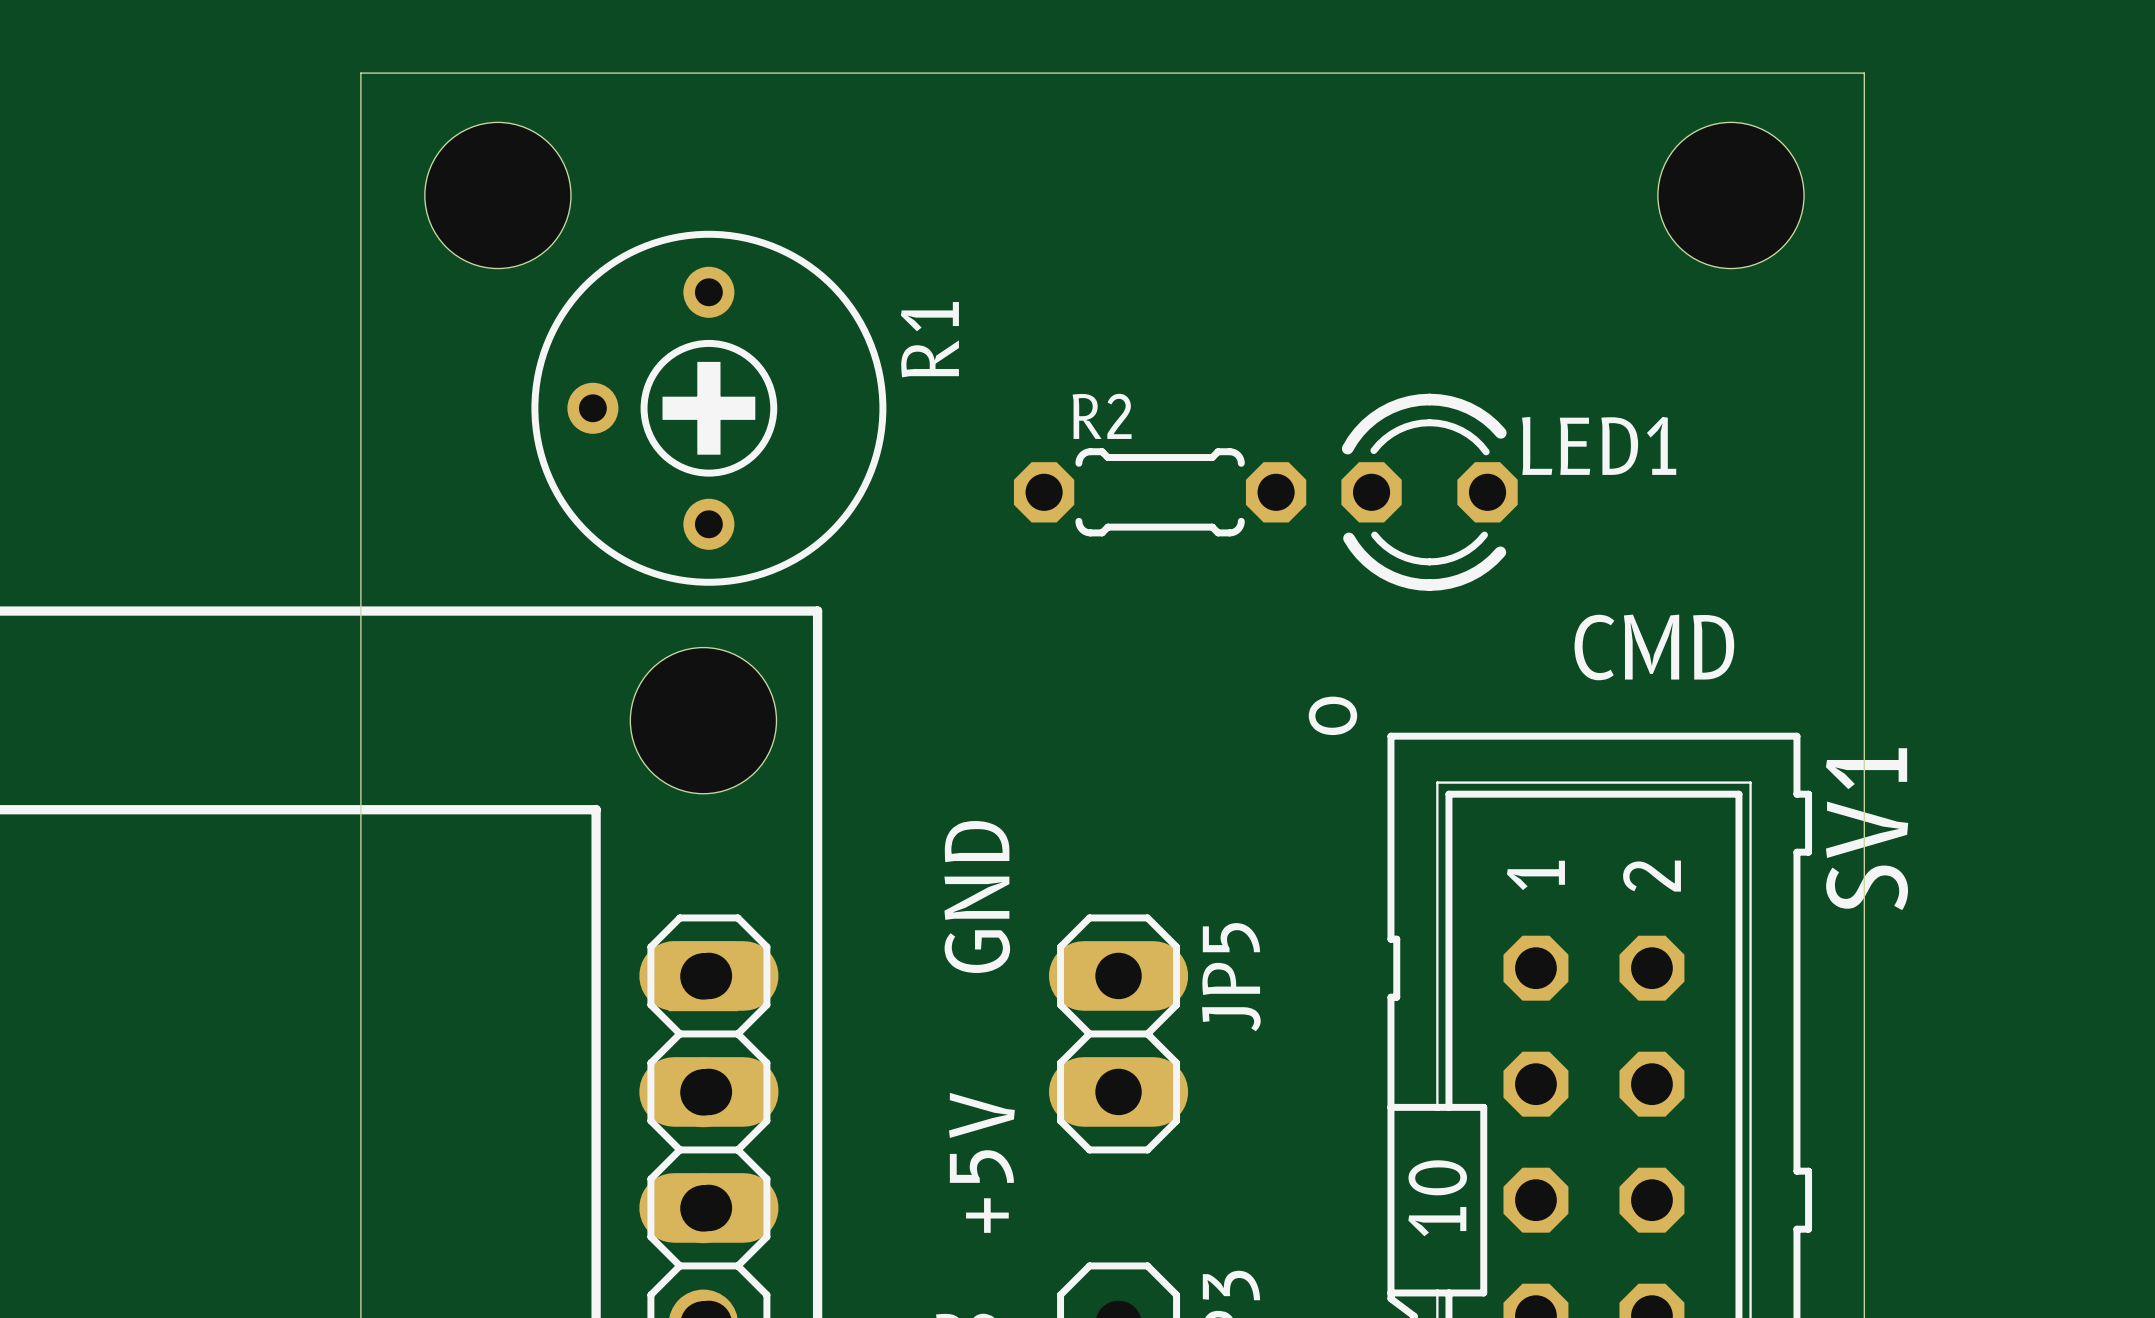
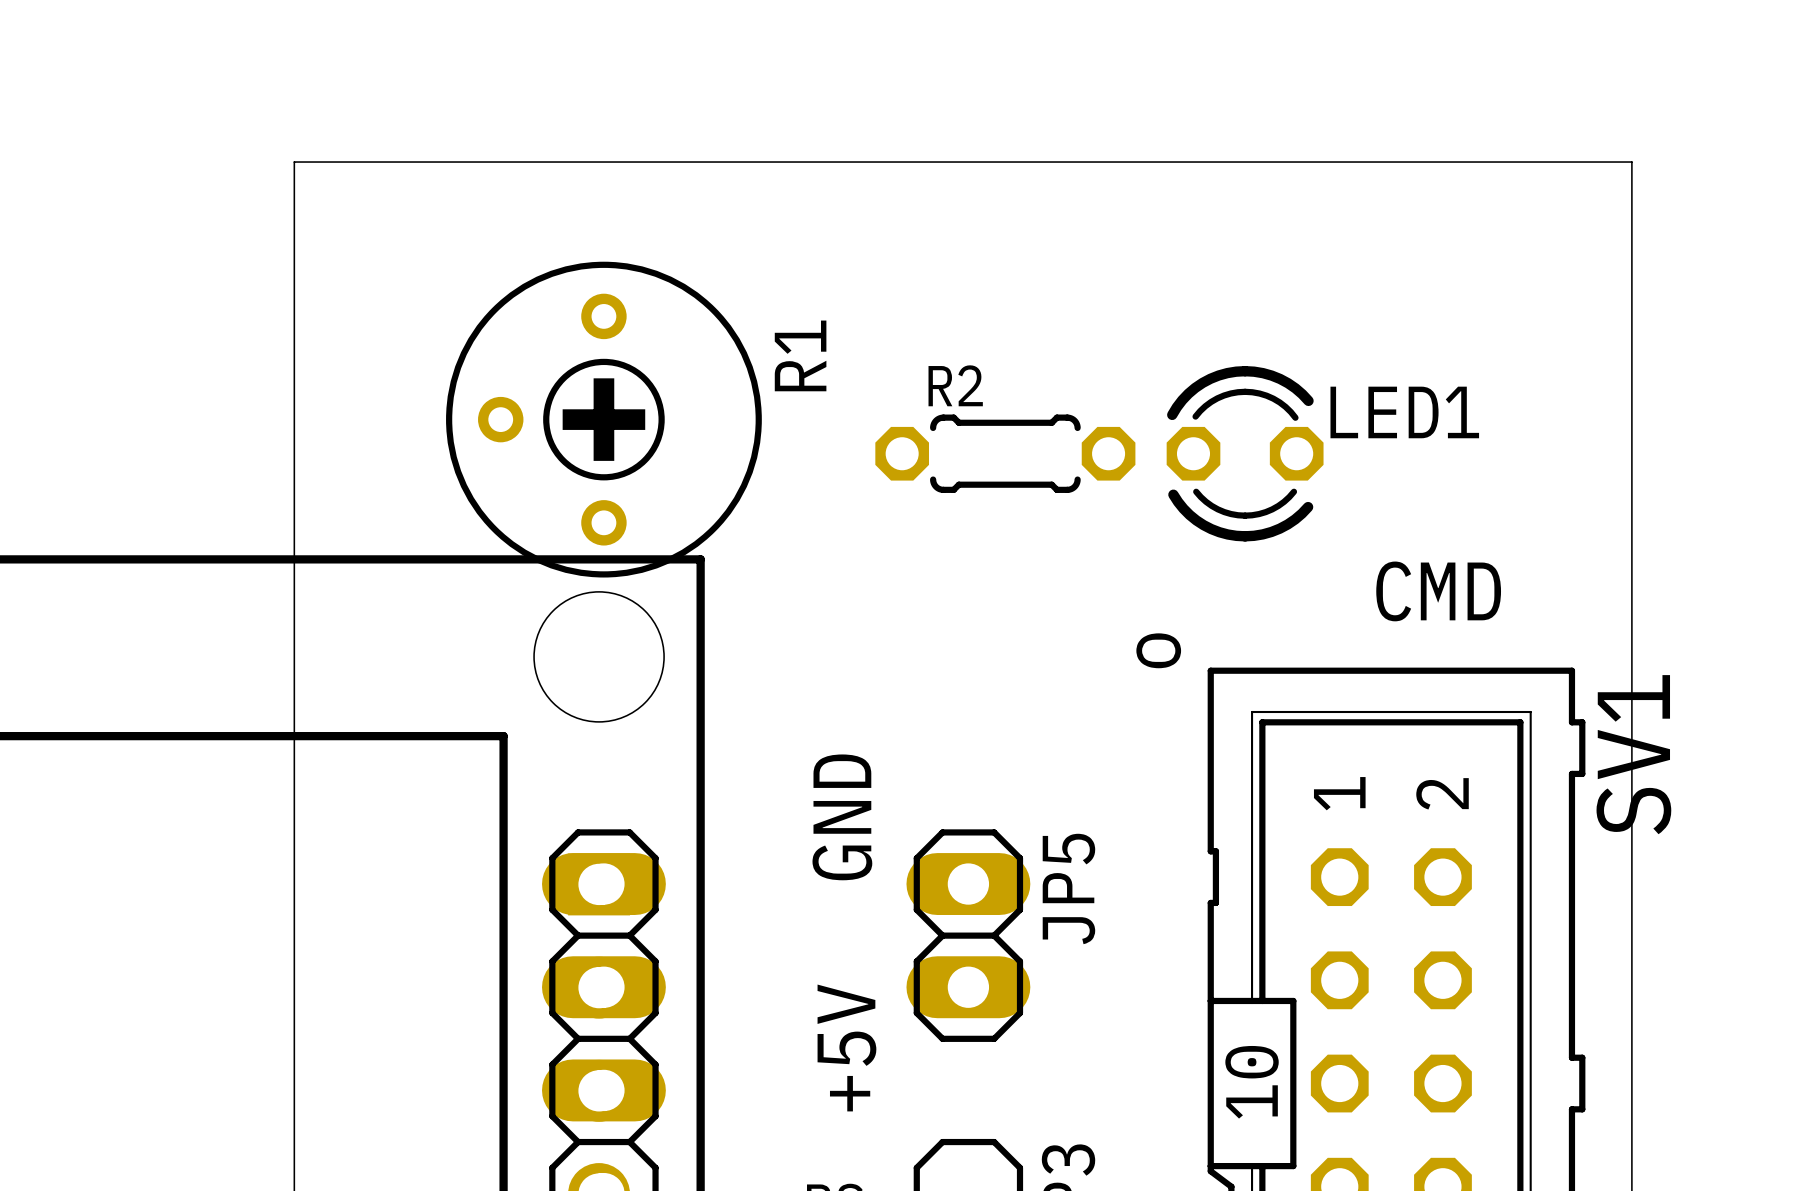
board edge: (360, 164) (360, 73) (1864, 73) (1864, 164) -> (294, 162) (1631, 162)
hole: (497, 195) -> none
hole: (1730, 195) -> none
R1 position: (708, 408) -> (603, 419)

